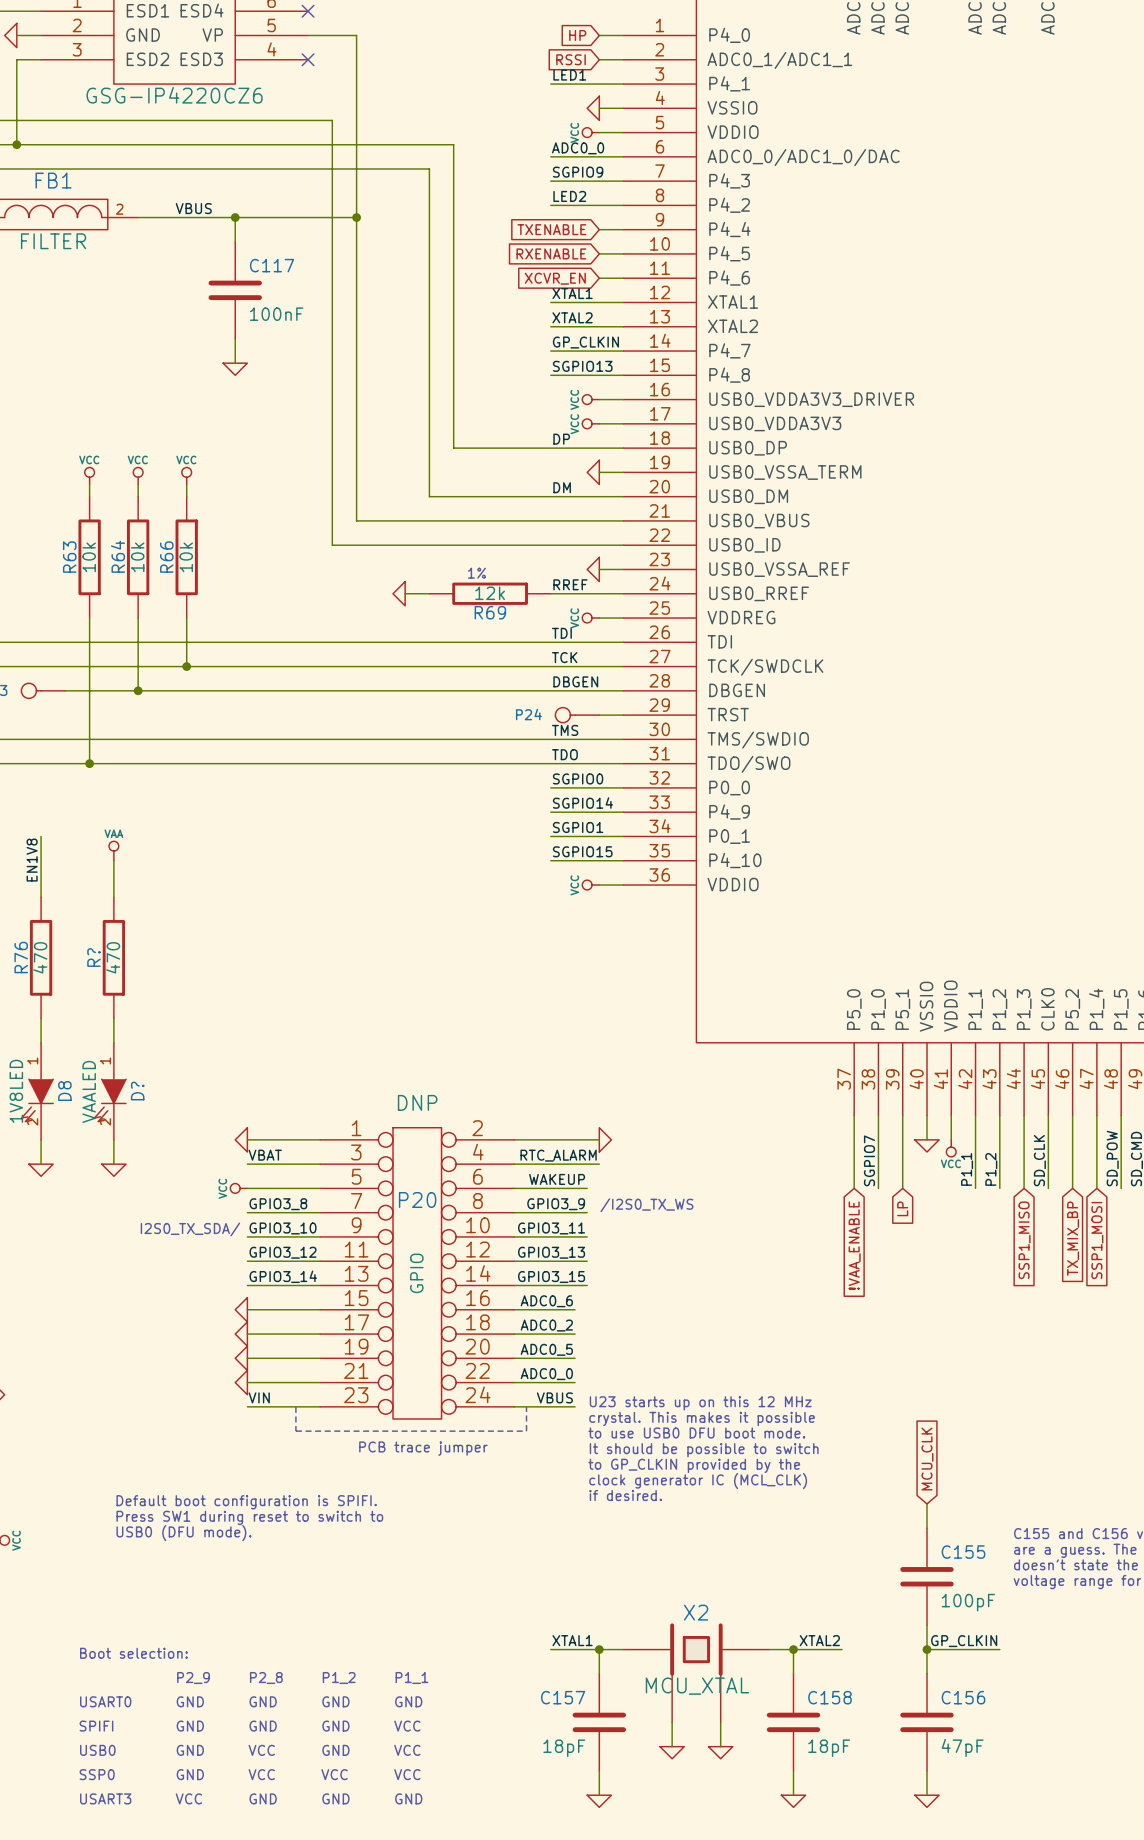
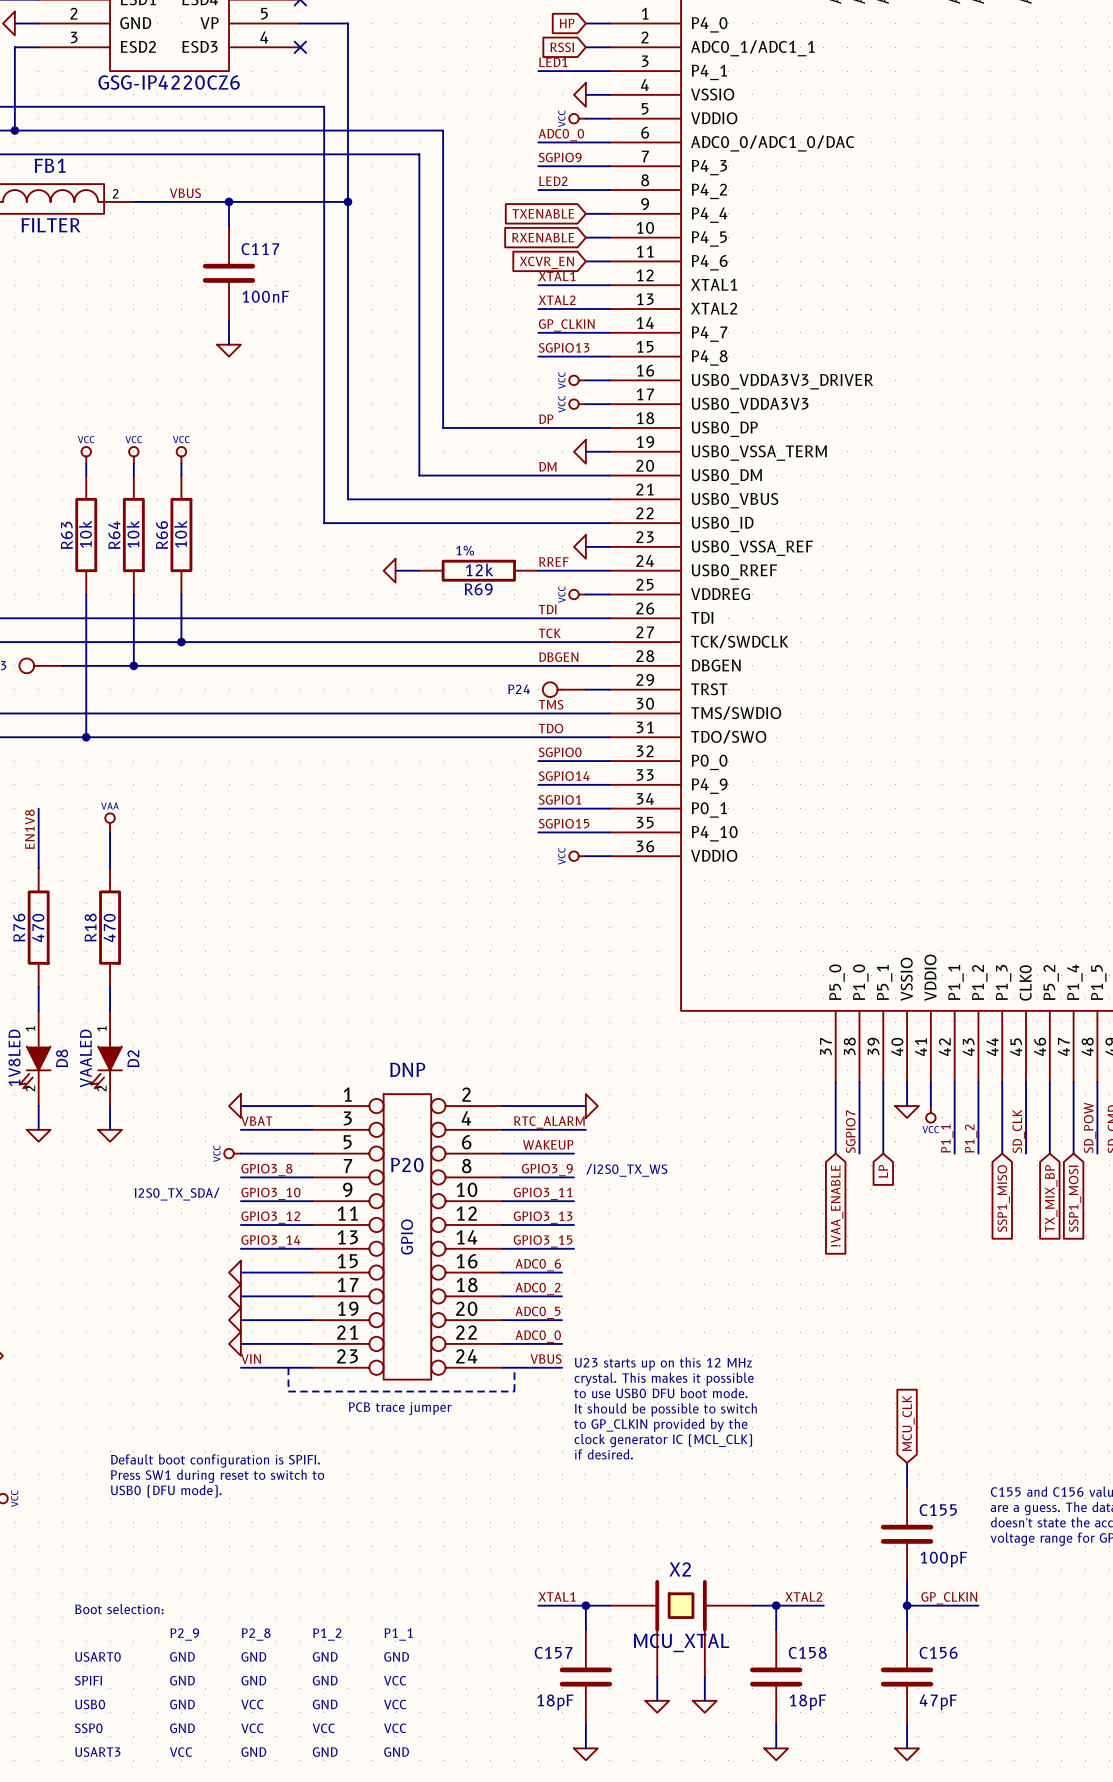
R? name: R? (94, 957) -> R18 (90, 927)
D? name: D? (137, 1091) -> D2 (133, 1058)

